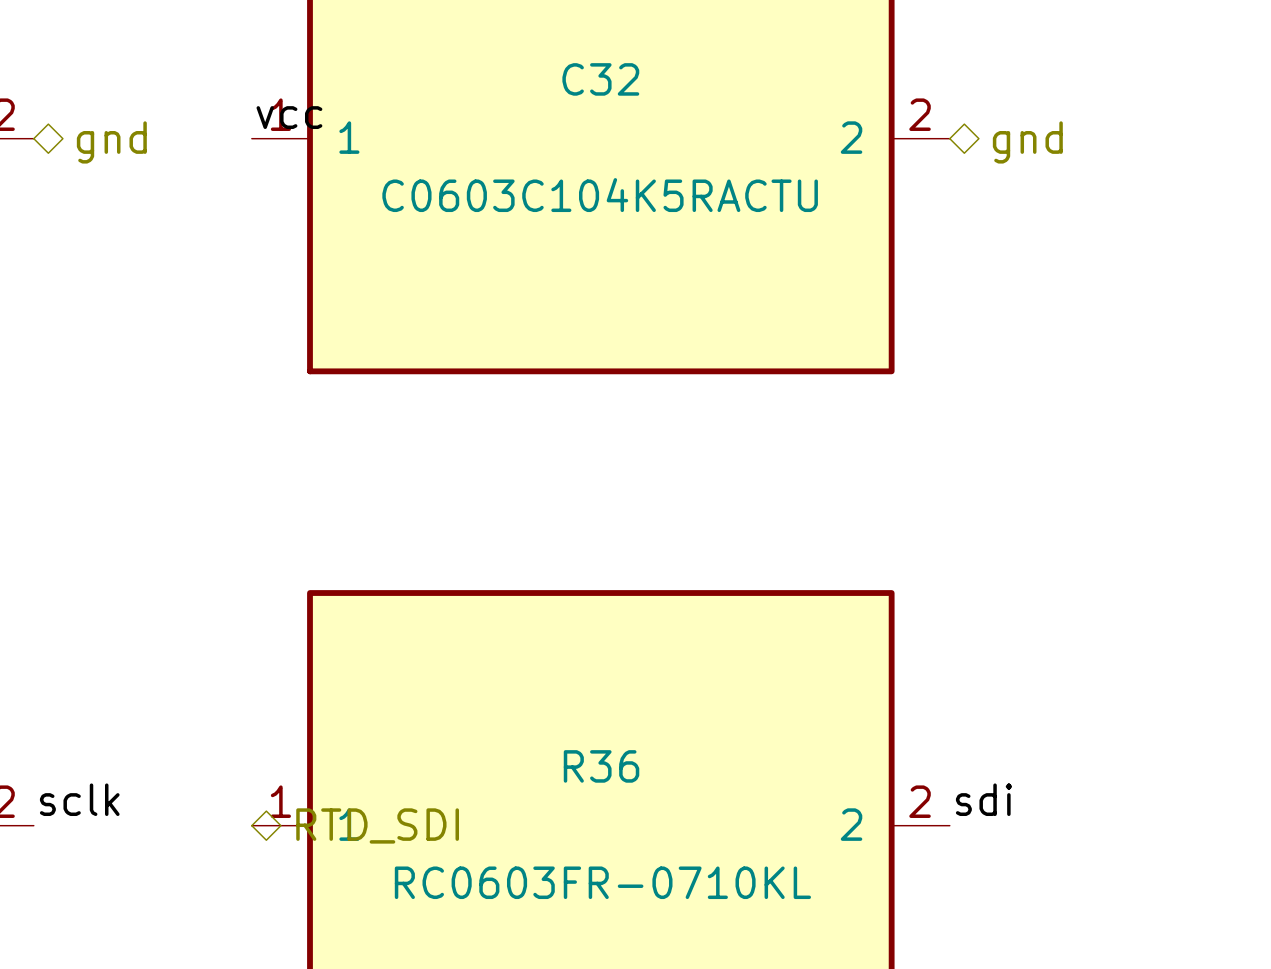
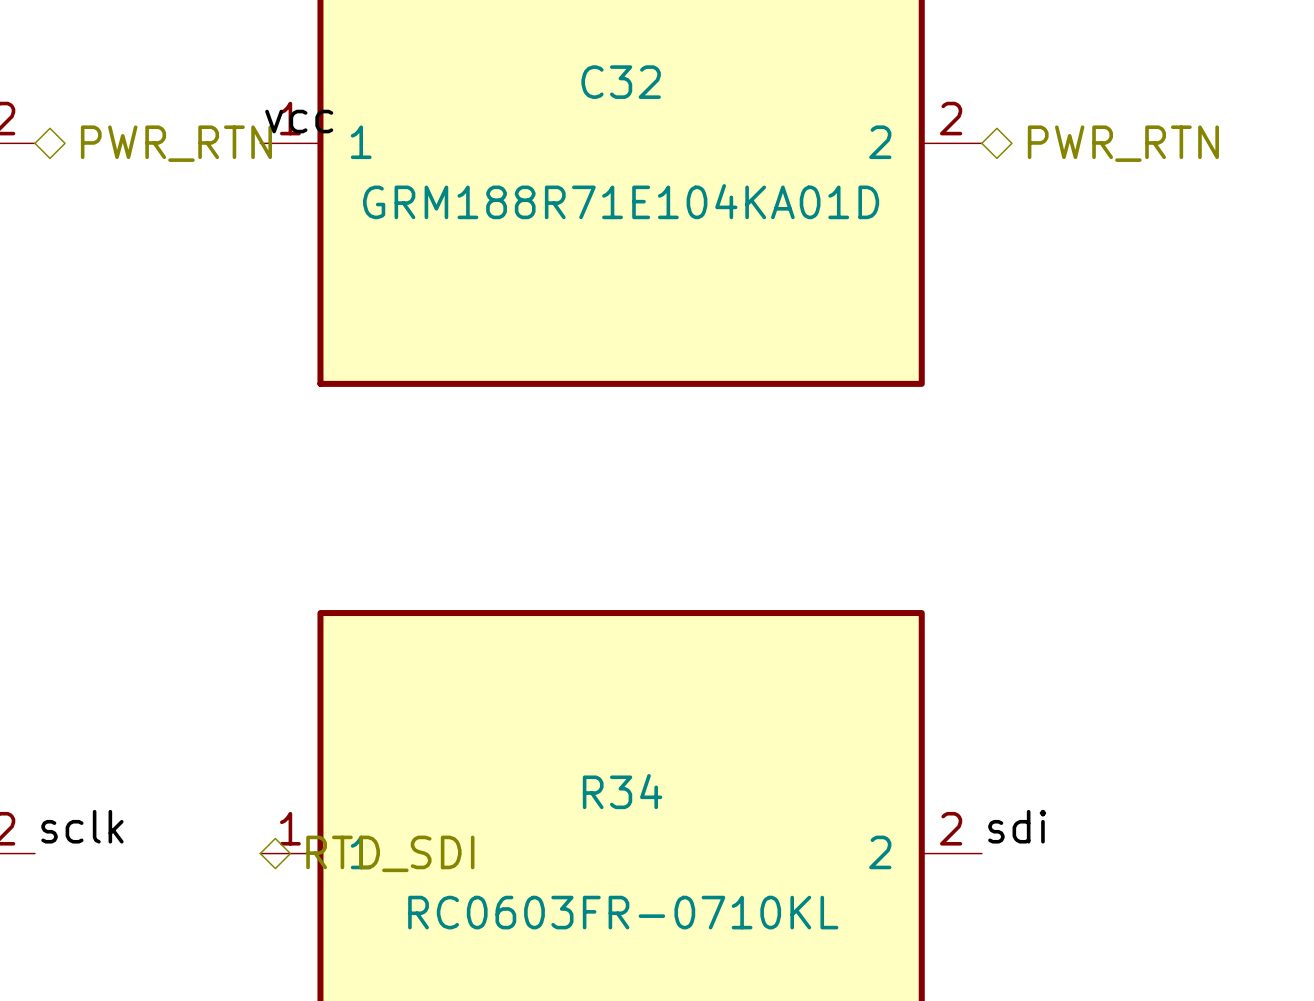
hierarchical label: gnd (111, 142) -> PWR_RTN (176, 143)
hierarchical label: gnd (1027, 142) -> PWR_RTN (1123, 143)
C32 value: C0603C104K5RACTU (600, 195) -> GRM188R71E104KA01D (621, 201)
R36 name: R36 (601, 766) -> R34 (622, 791)

